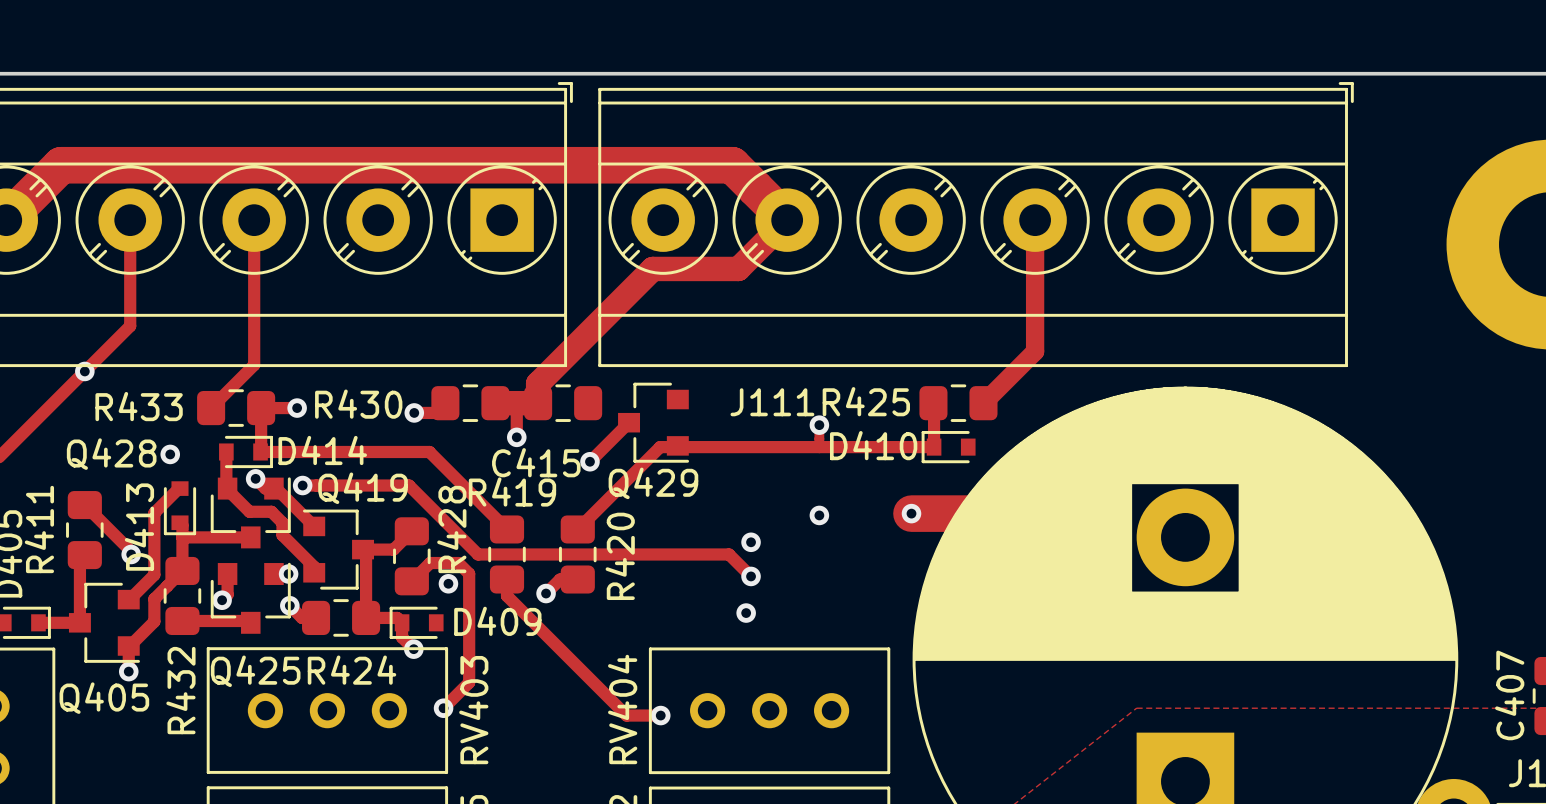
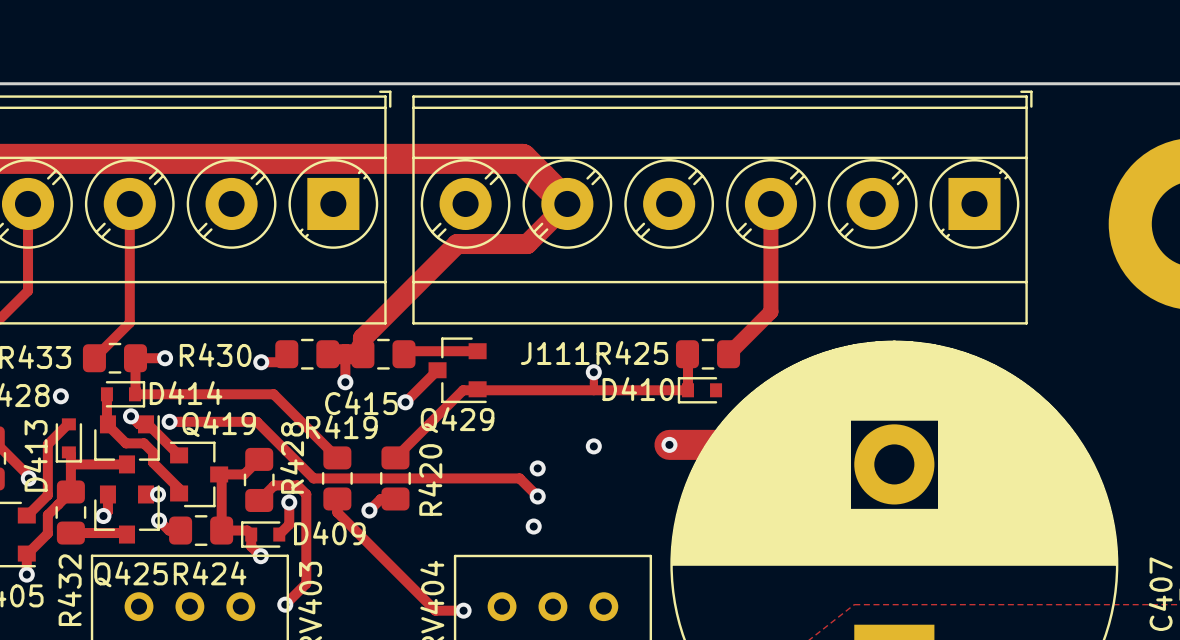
track: none -> (477, 351) (406, 351) (403, 354)
track: none -> (289, 502) (289, 524) (279, 534)

